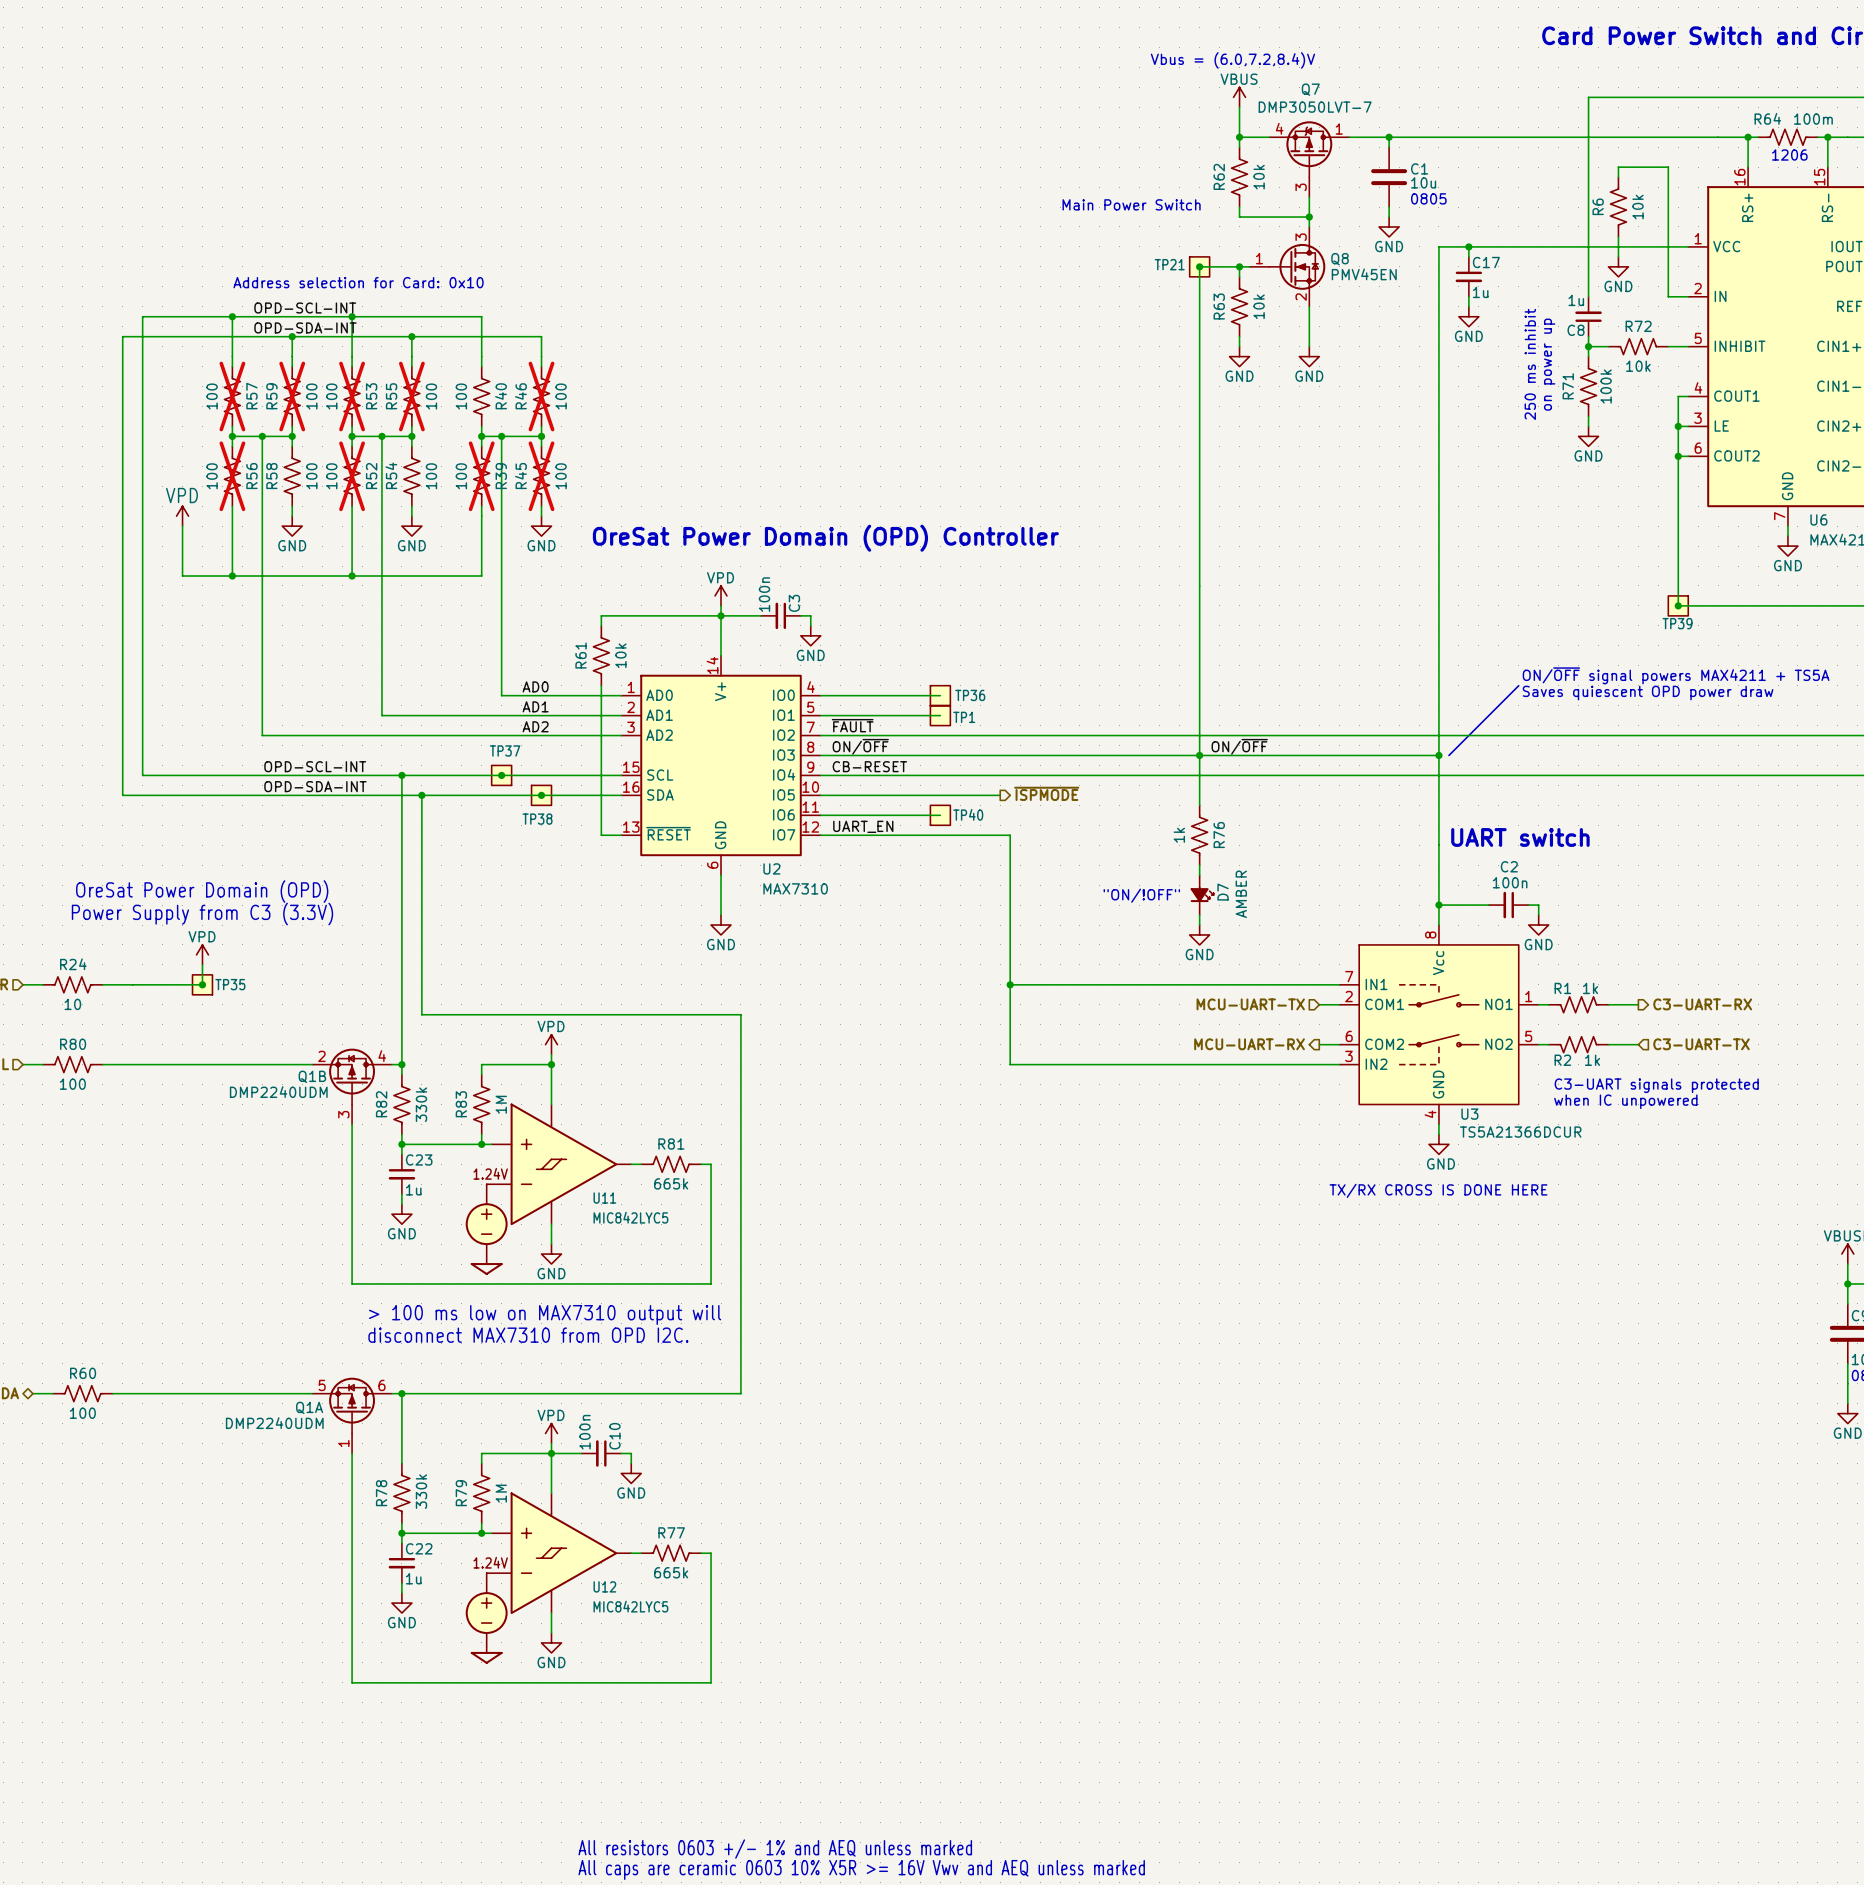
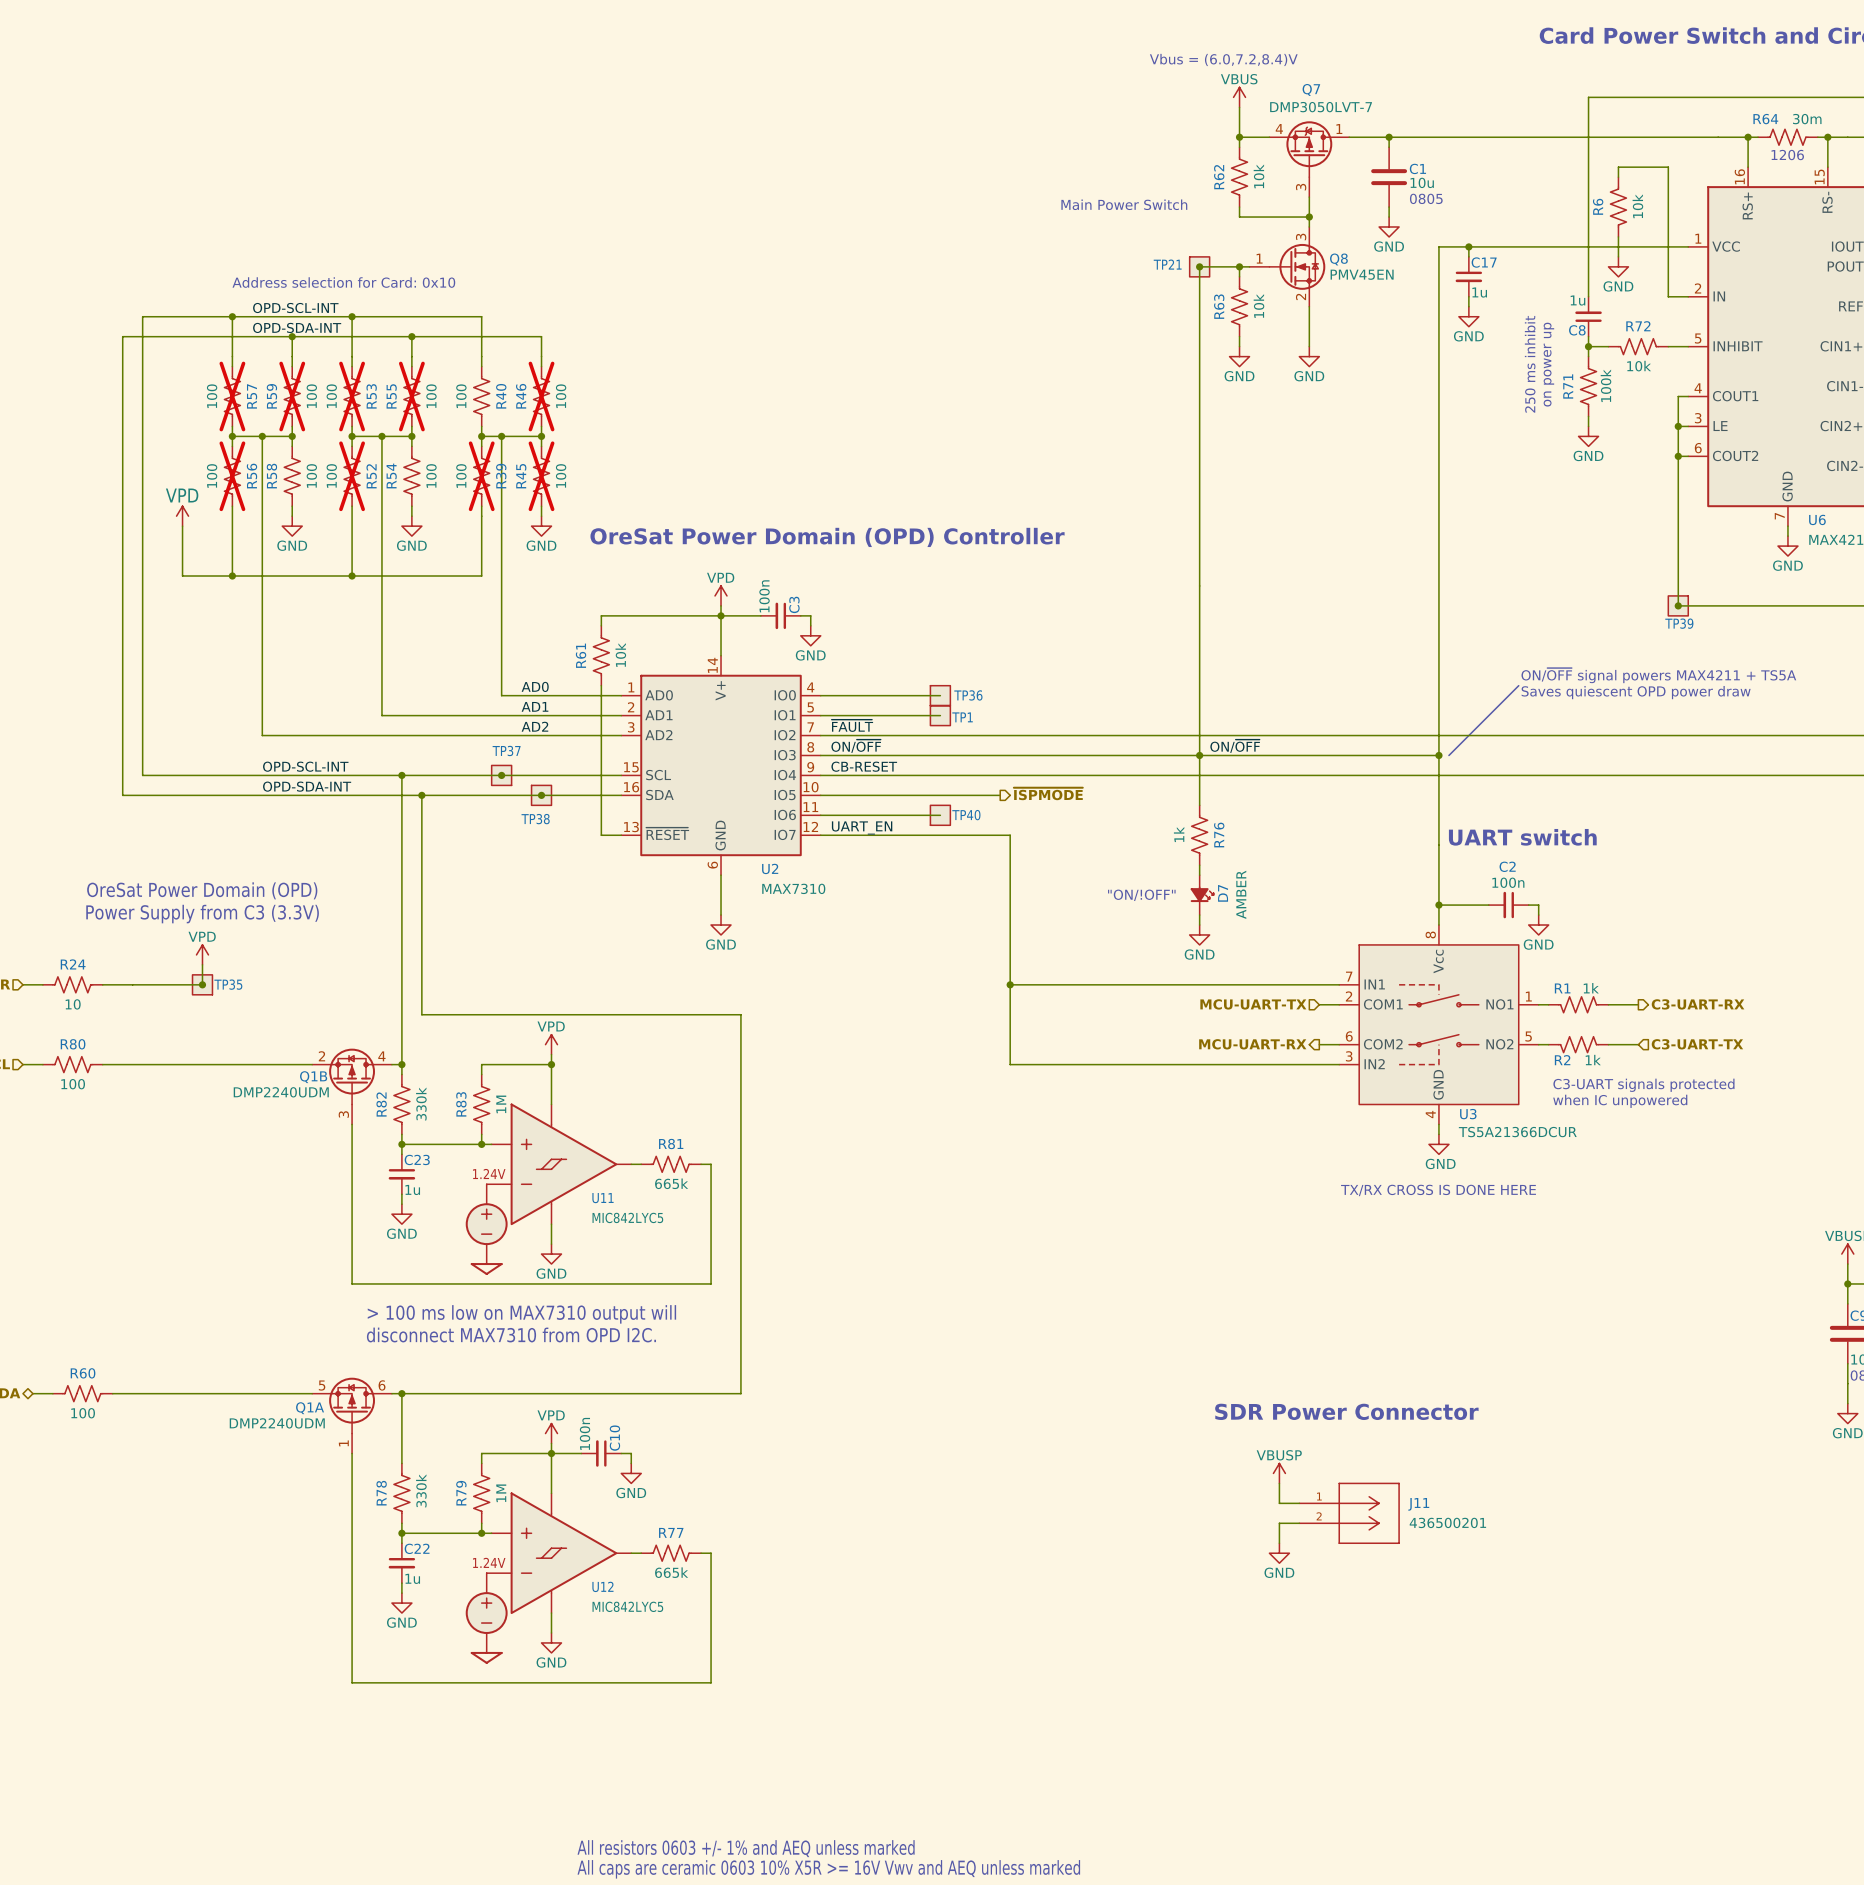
R64 value: 100m (1813, 119) -> 30m (1807, 119)
text: none -> SDR Power Connector (1346, 1411)
power symbol: none -> VBUSP (1279, 1473)
wire: none -> (1279, 1483) (1279, 1503) (1299, 1503)
J11: none -> 436500201 (1349, 1513)
wire: none -> (1299, 1523) (1279, 1523) (1279, 1543)
power symbol: none -> GND (1279, 1553)

